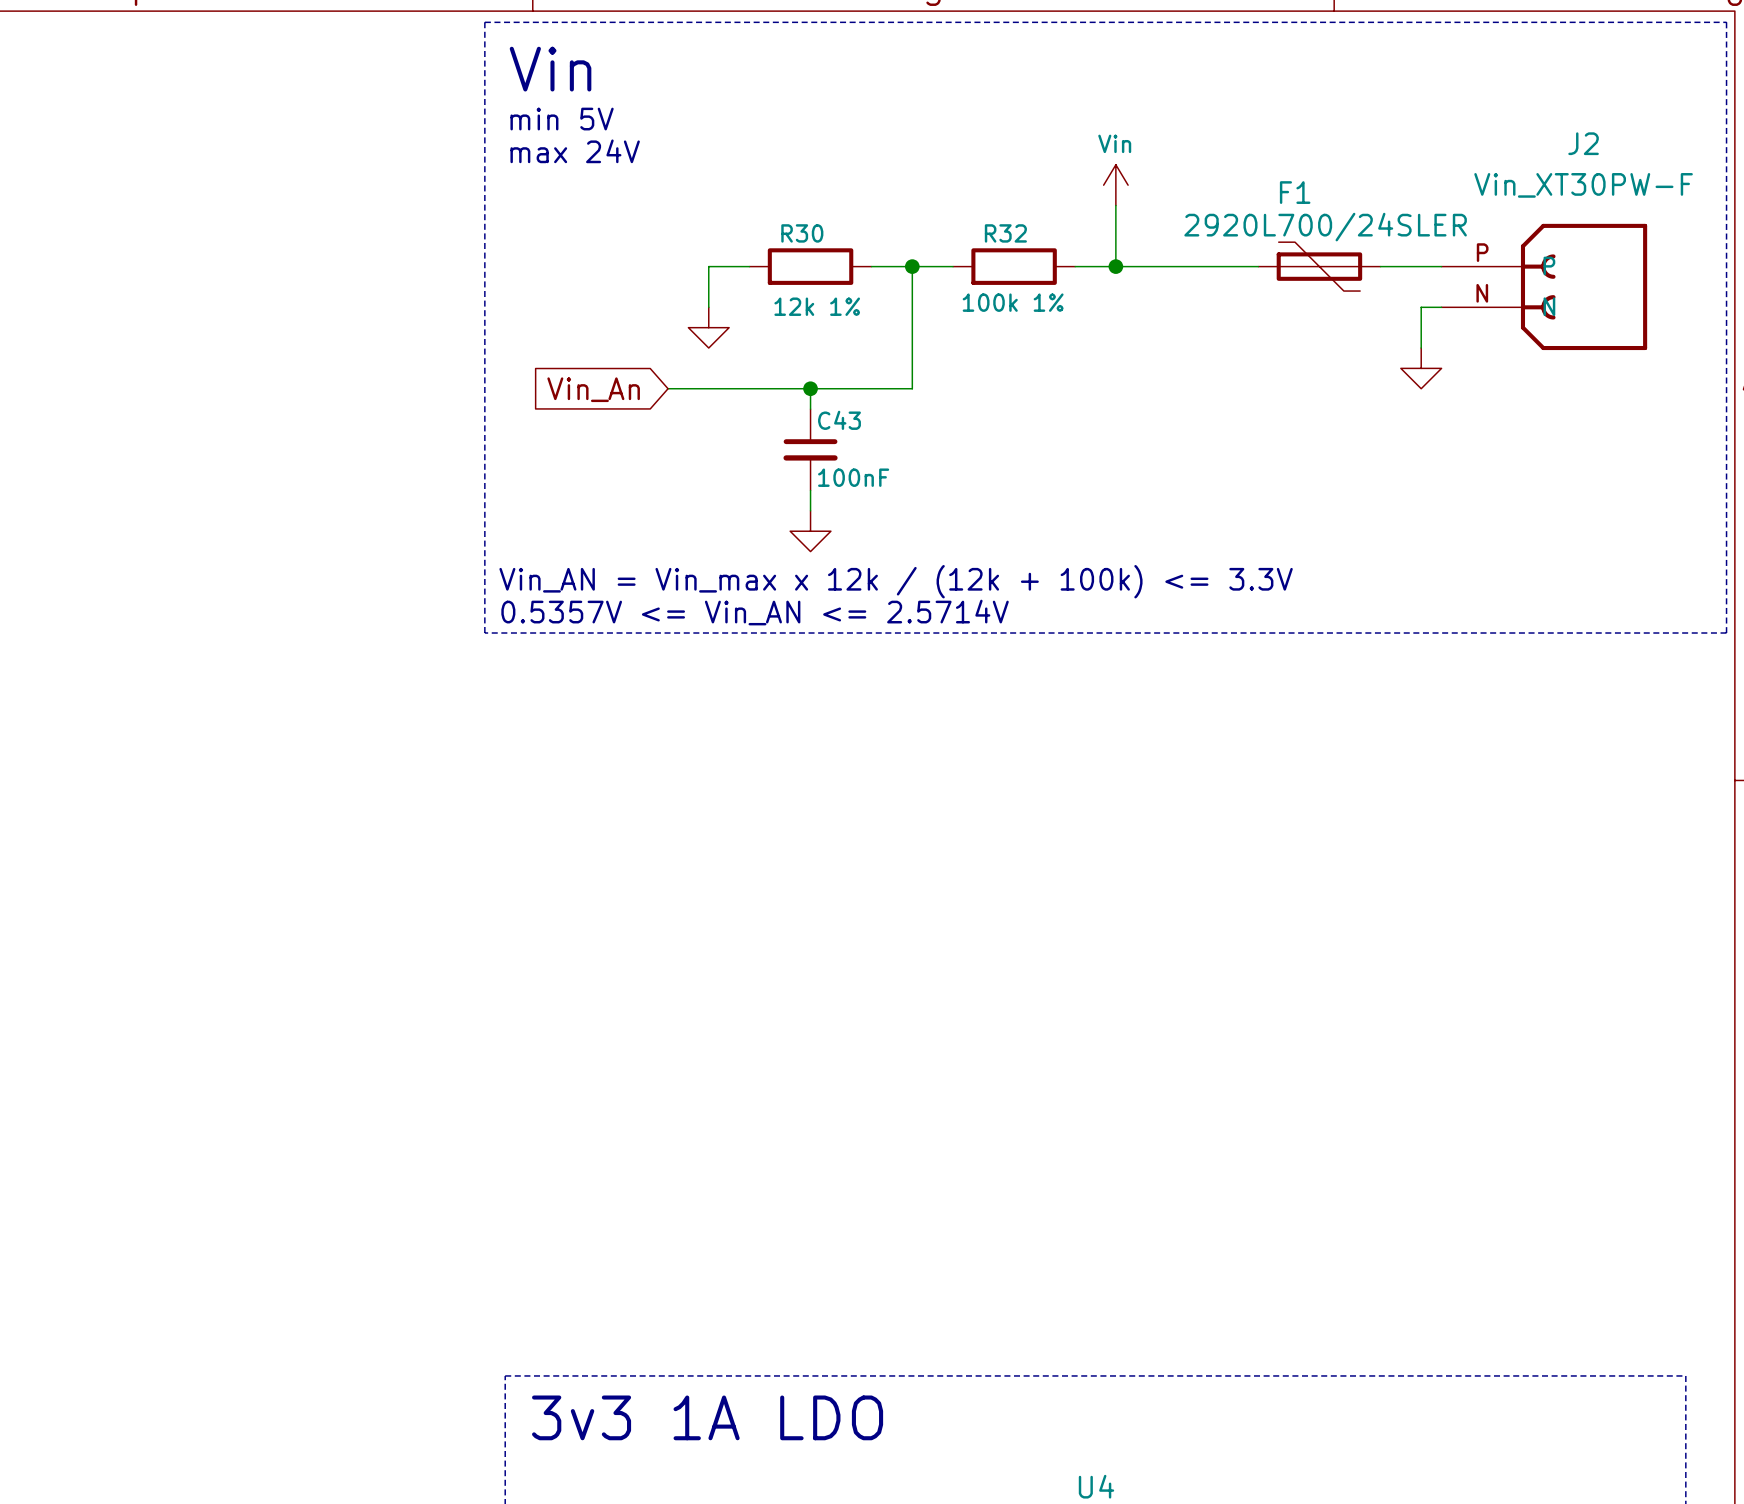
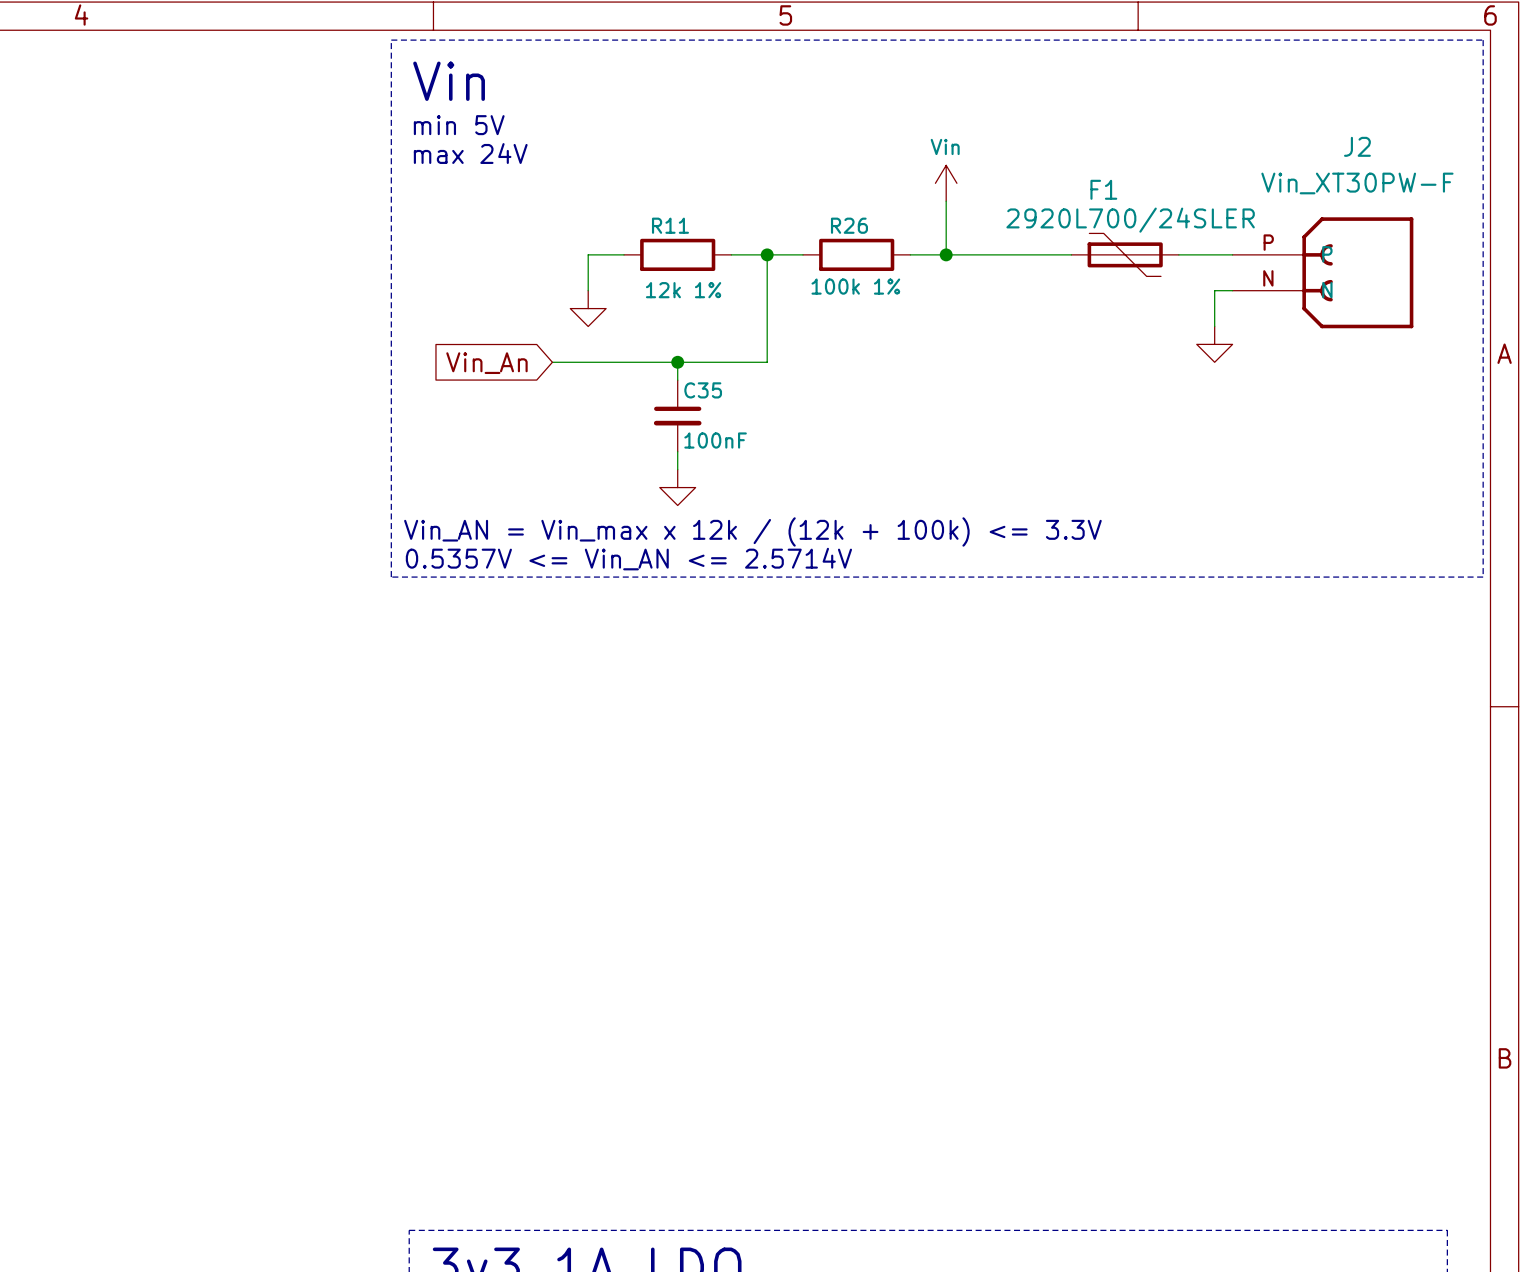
R30 name: R30 (802, 233) -> R11 (670, 225)
R32 name: R32 (1005, 233) -> R26 (849, 225)
C43 name: C43 (839, 420) -> C35 (703, 390)

